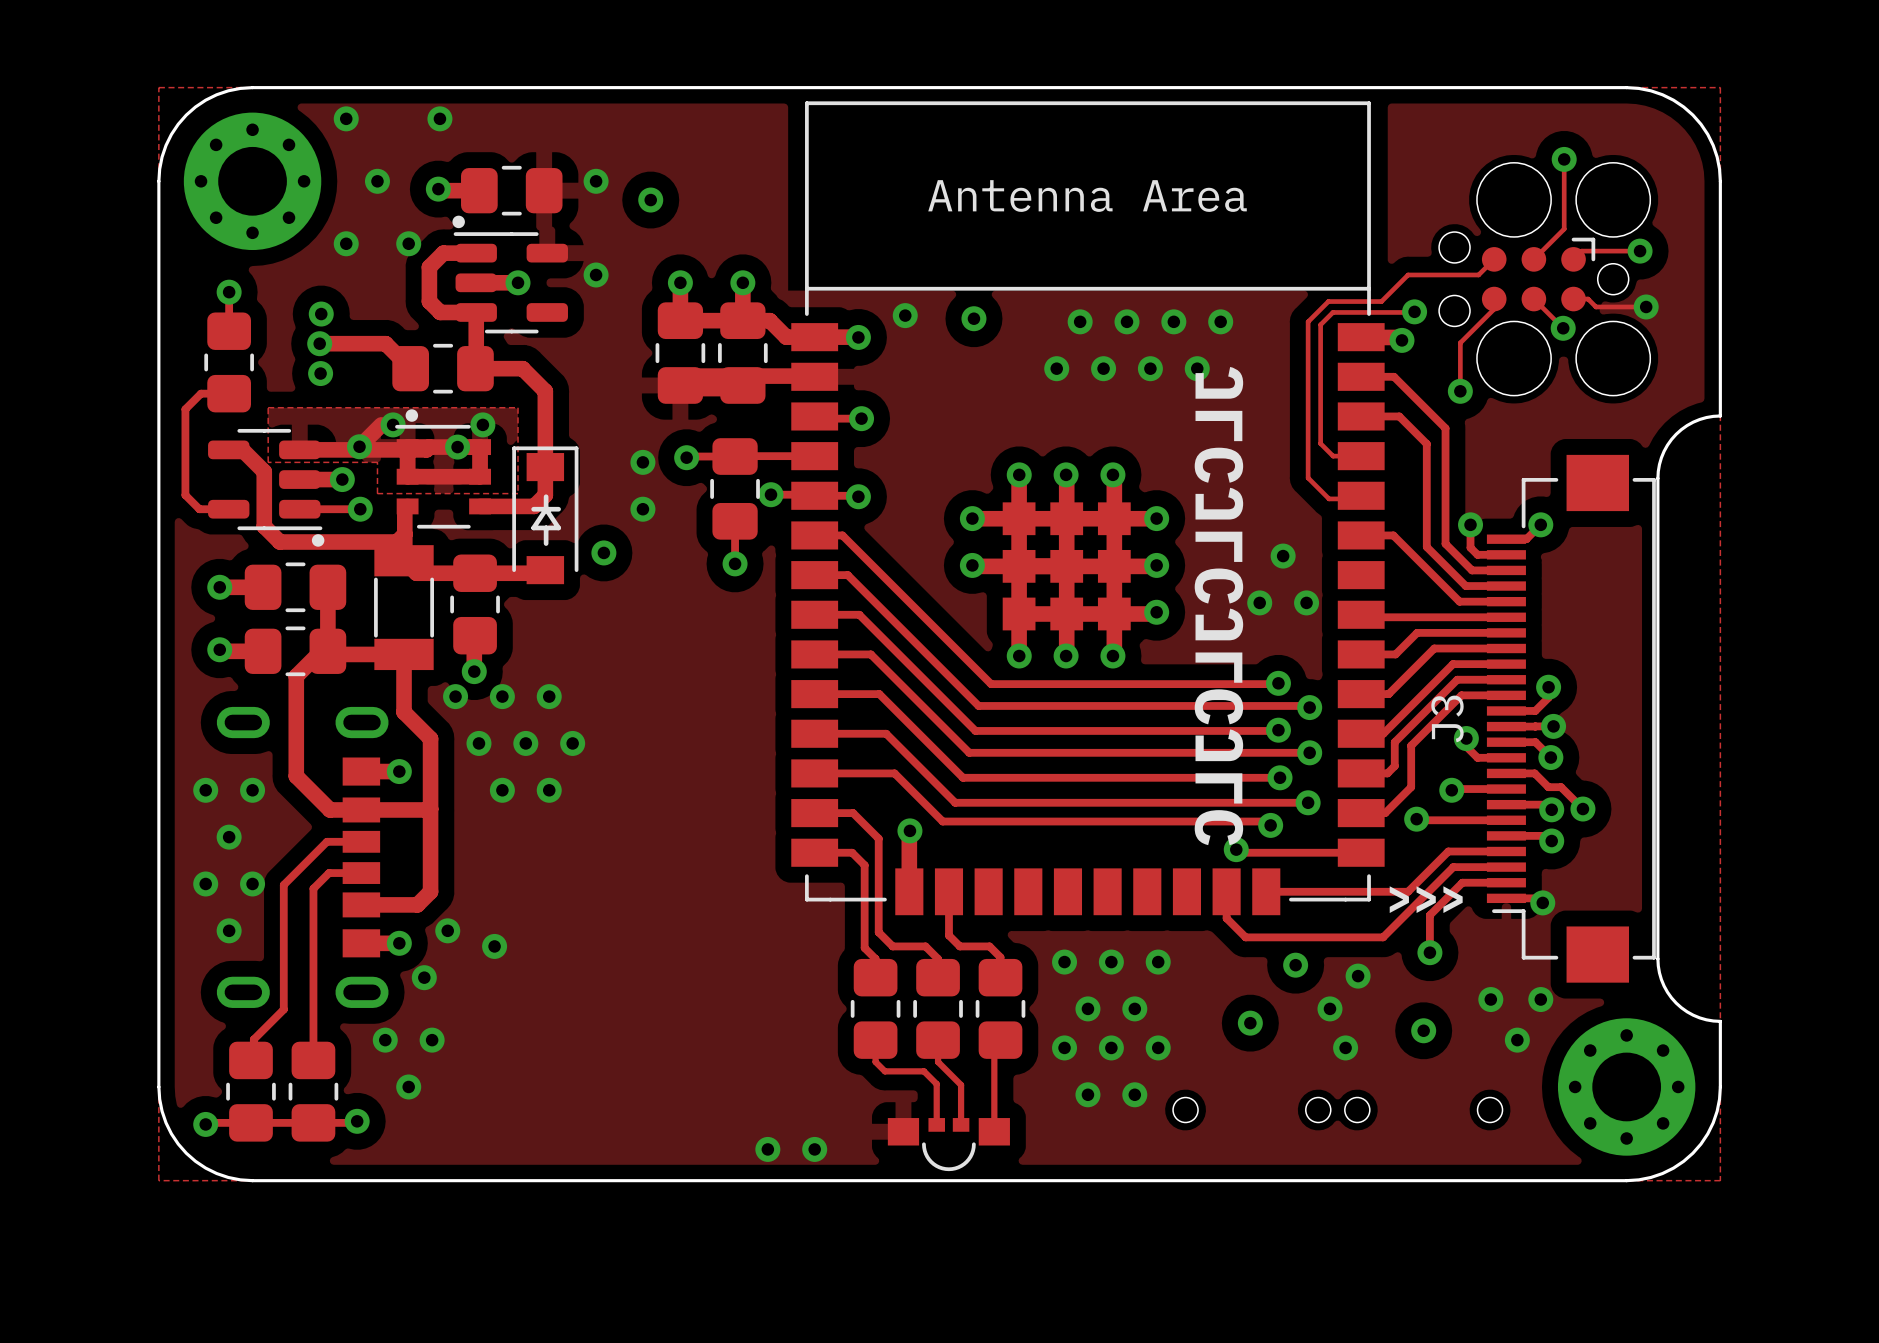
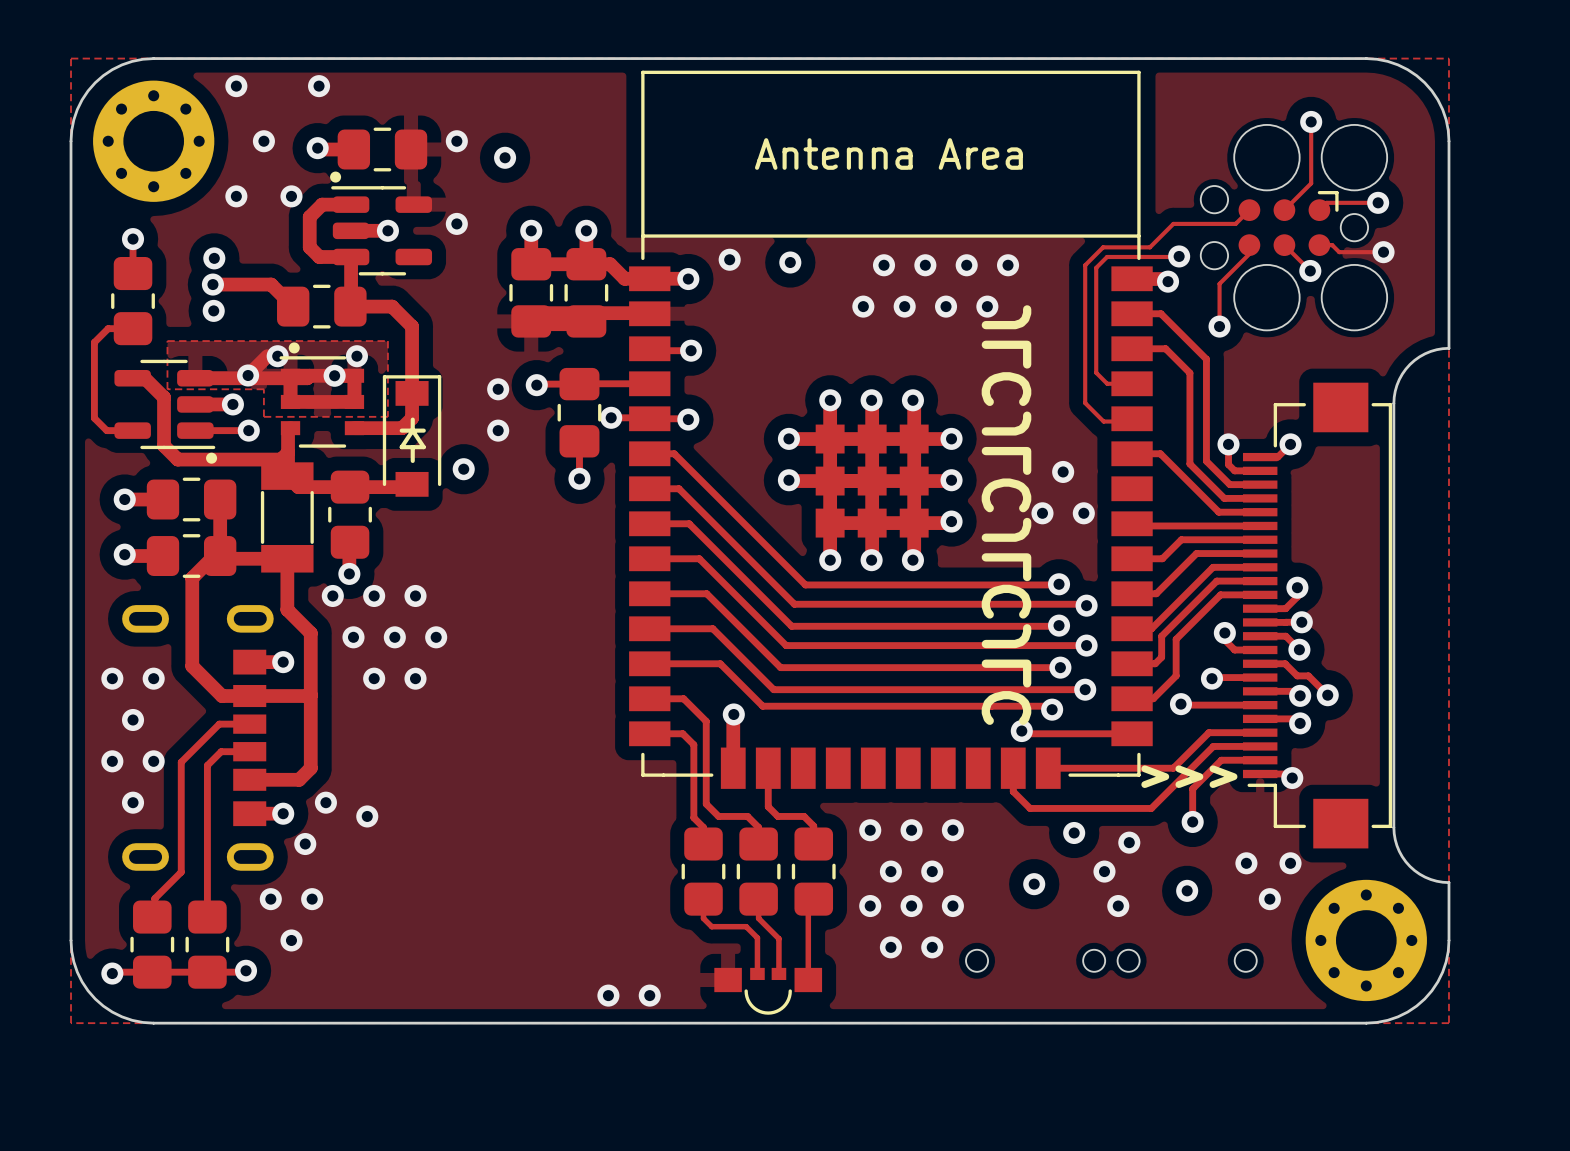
J3 name: J3 (1447, 718) -> none

